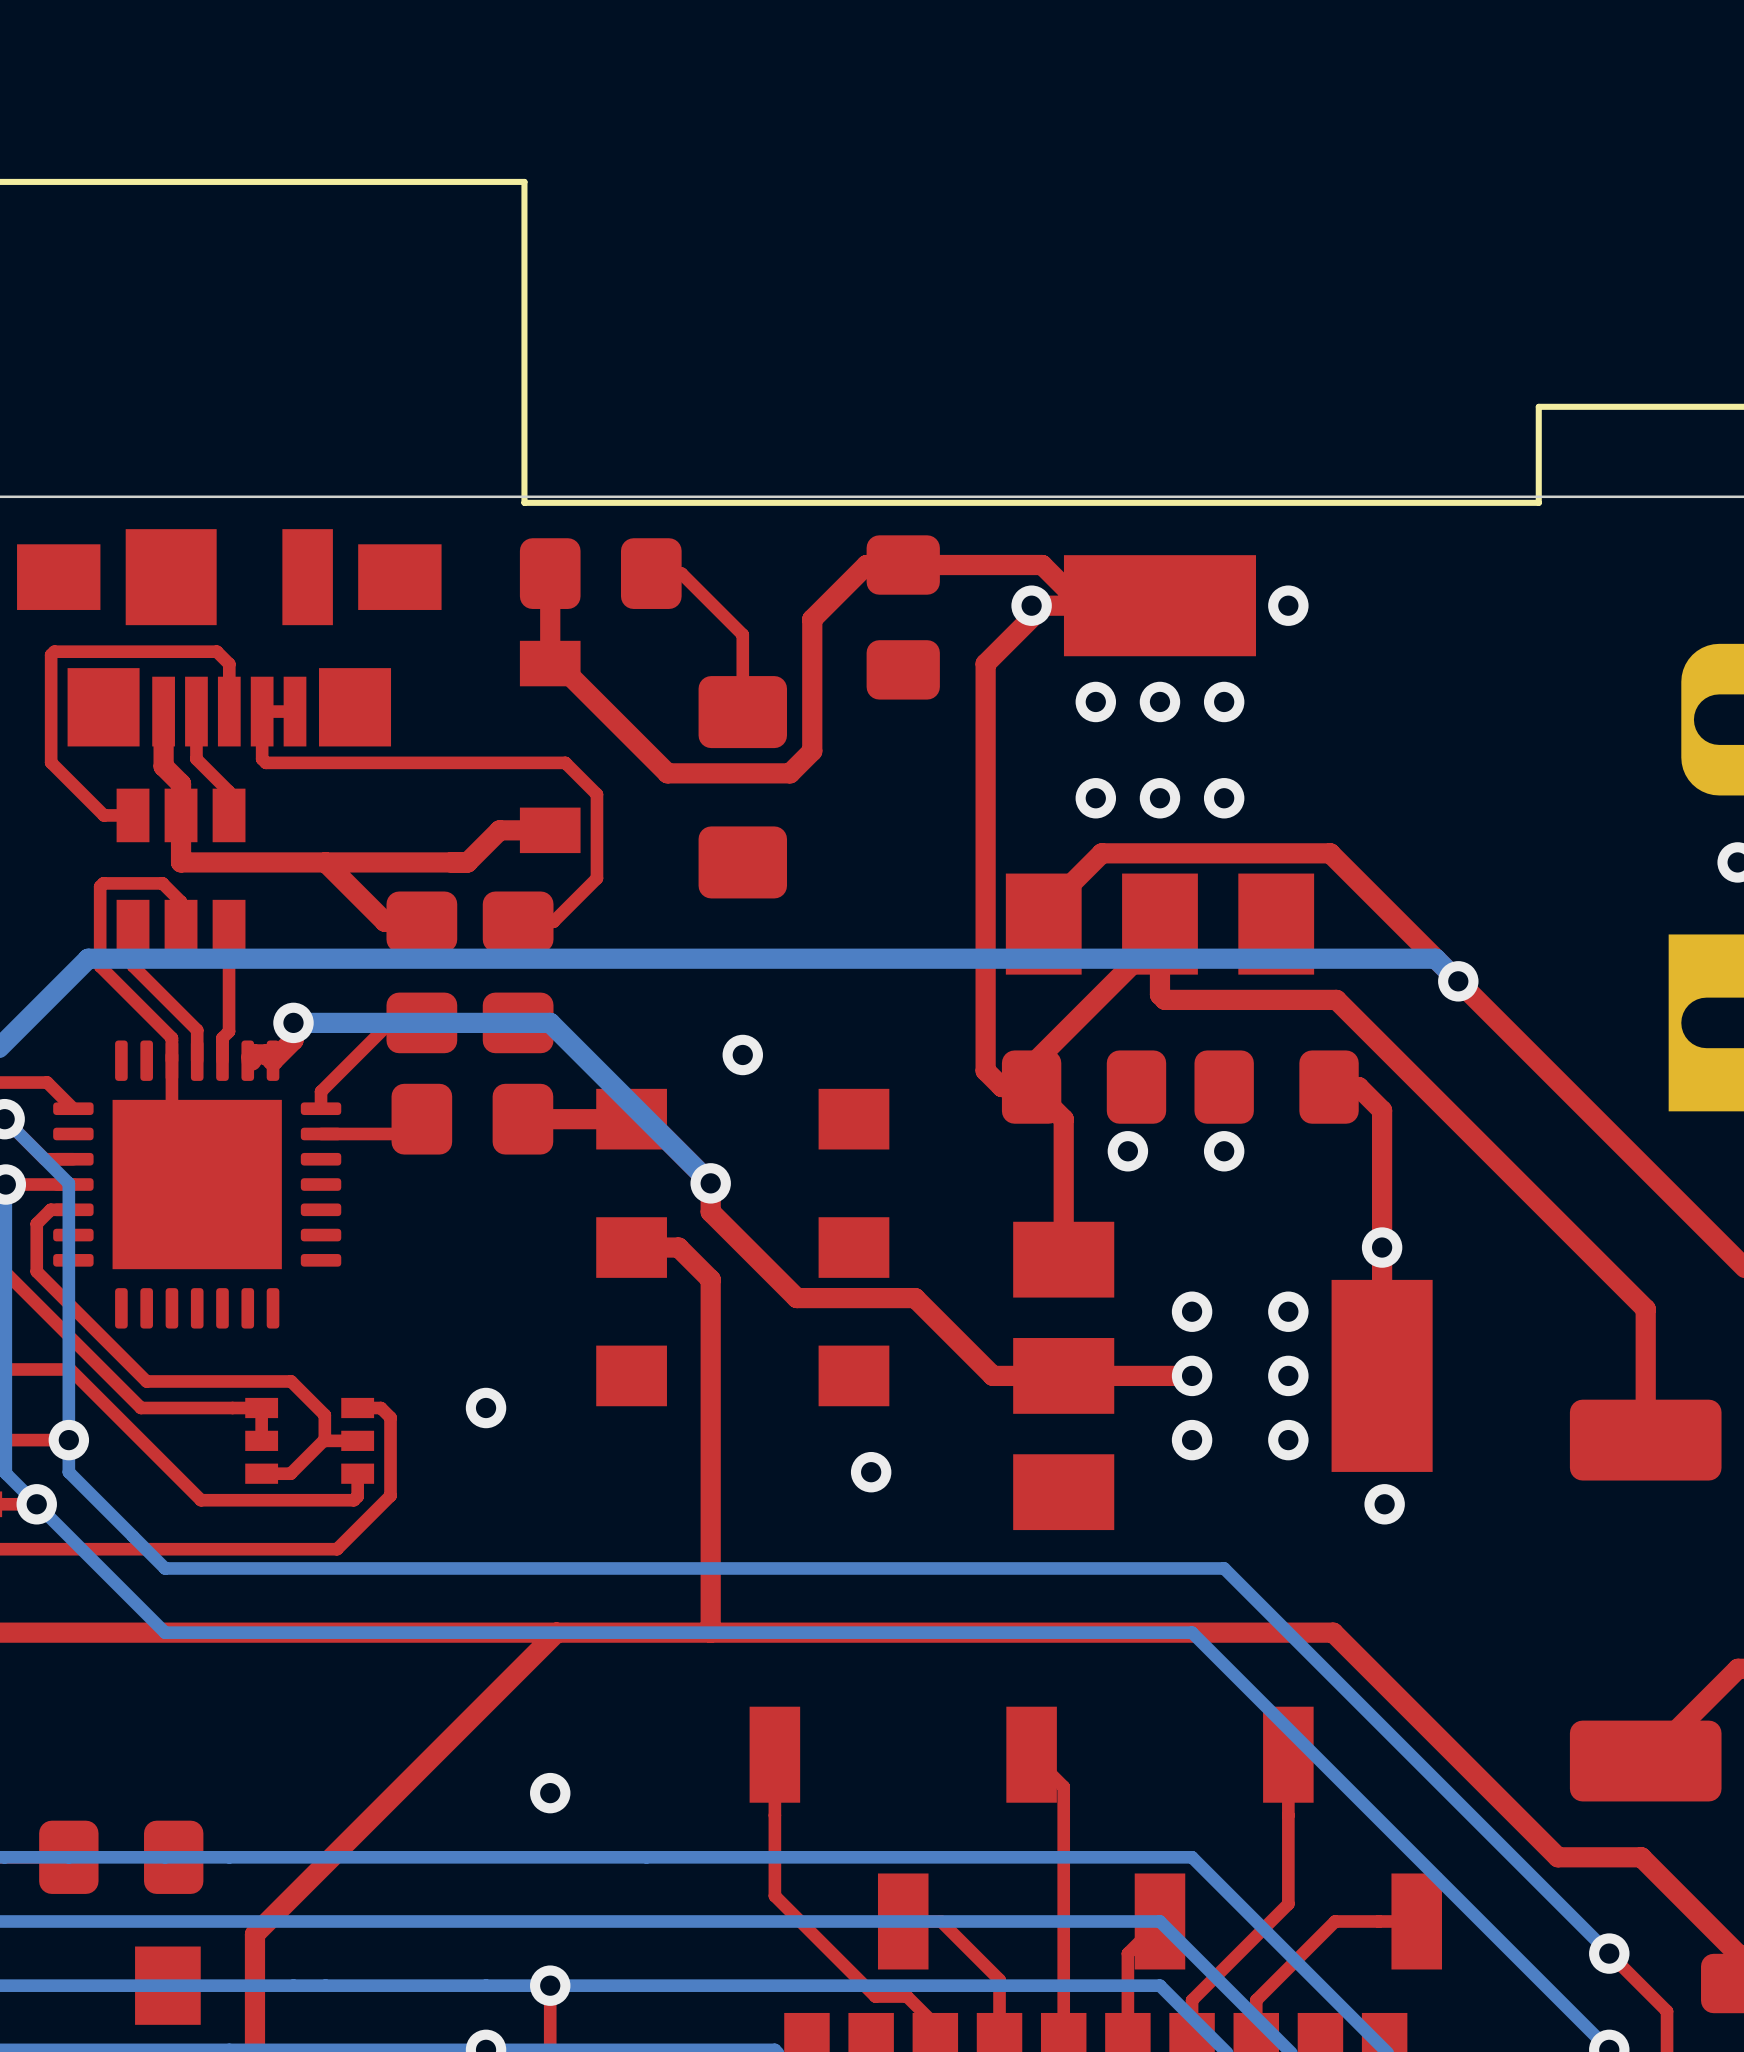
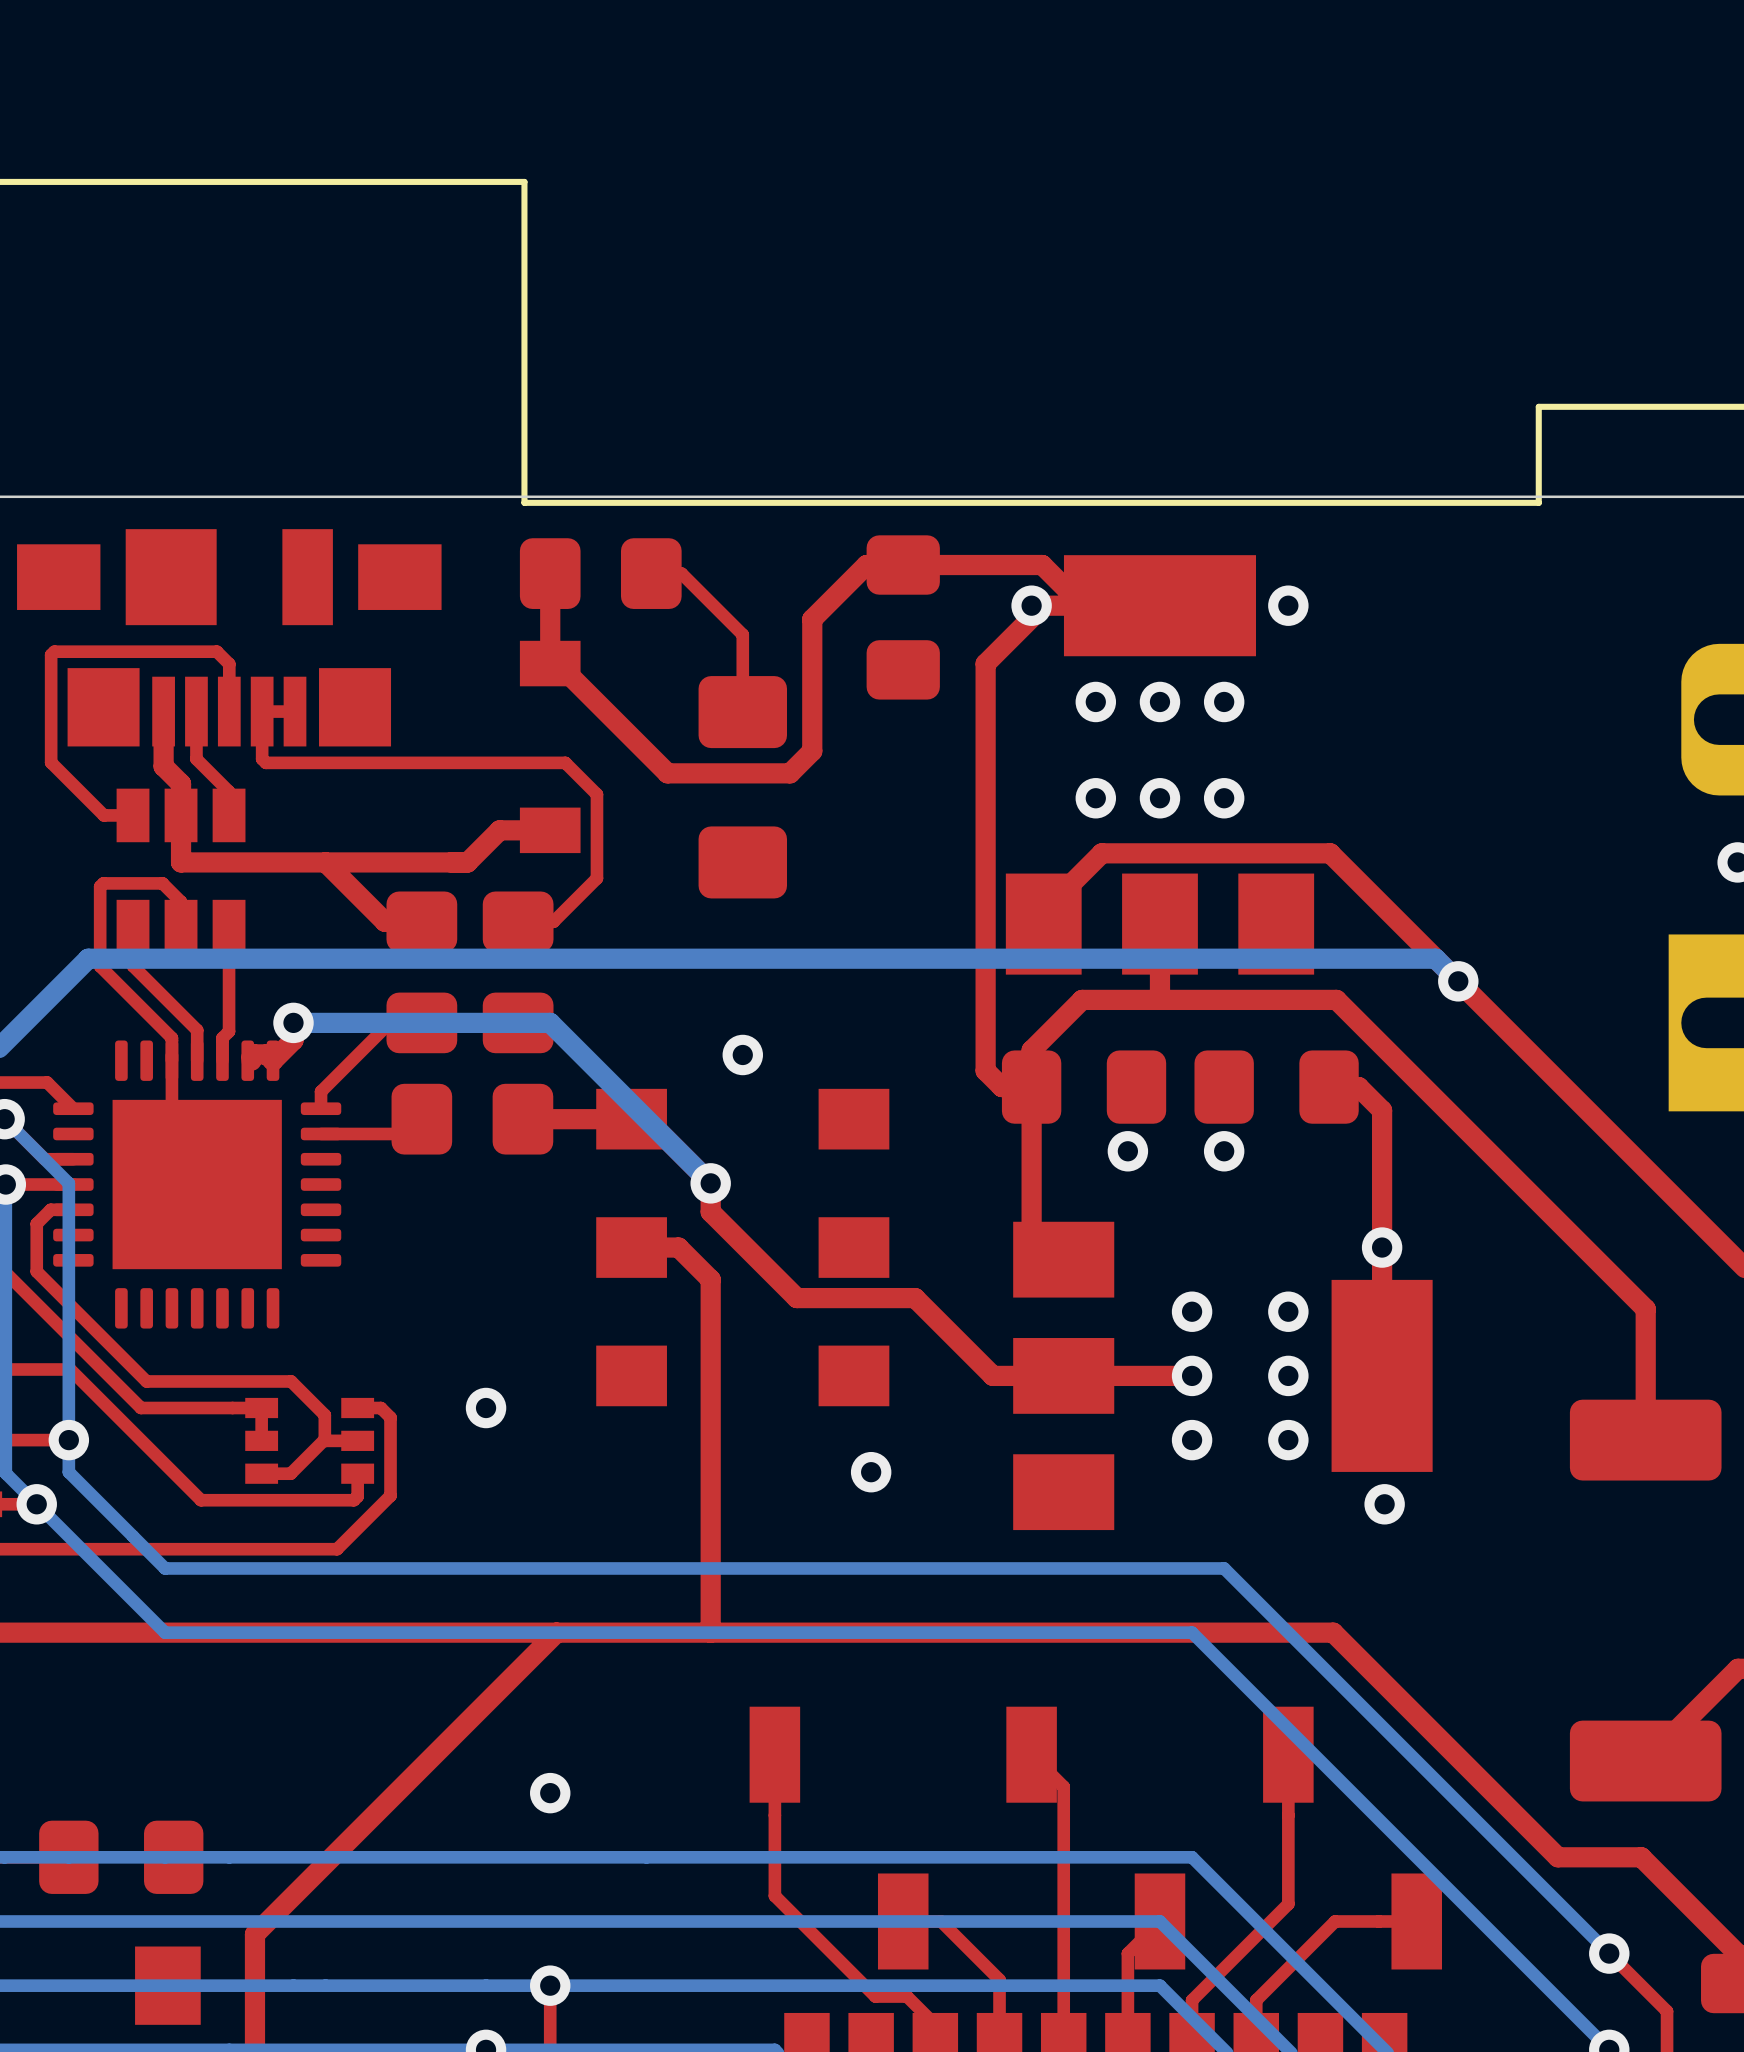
top track: (1159, 936) (1031, 1065) -> (1165, 999) (1082, 999) (1031, 1050) (1031, 1065)
top track: (1031, 1087) (1063, 1119) (1063, 1259) -> (1031, 1087) (1031, 1227) (1063, 1259)

